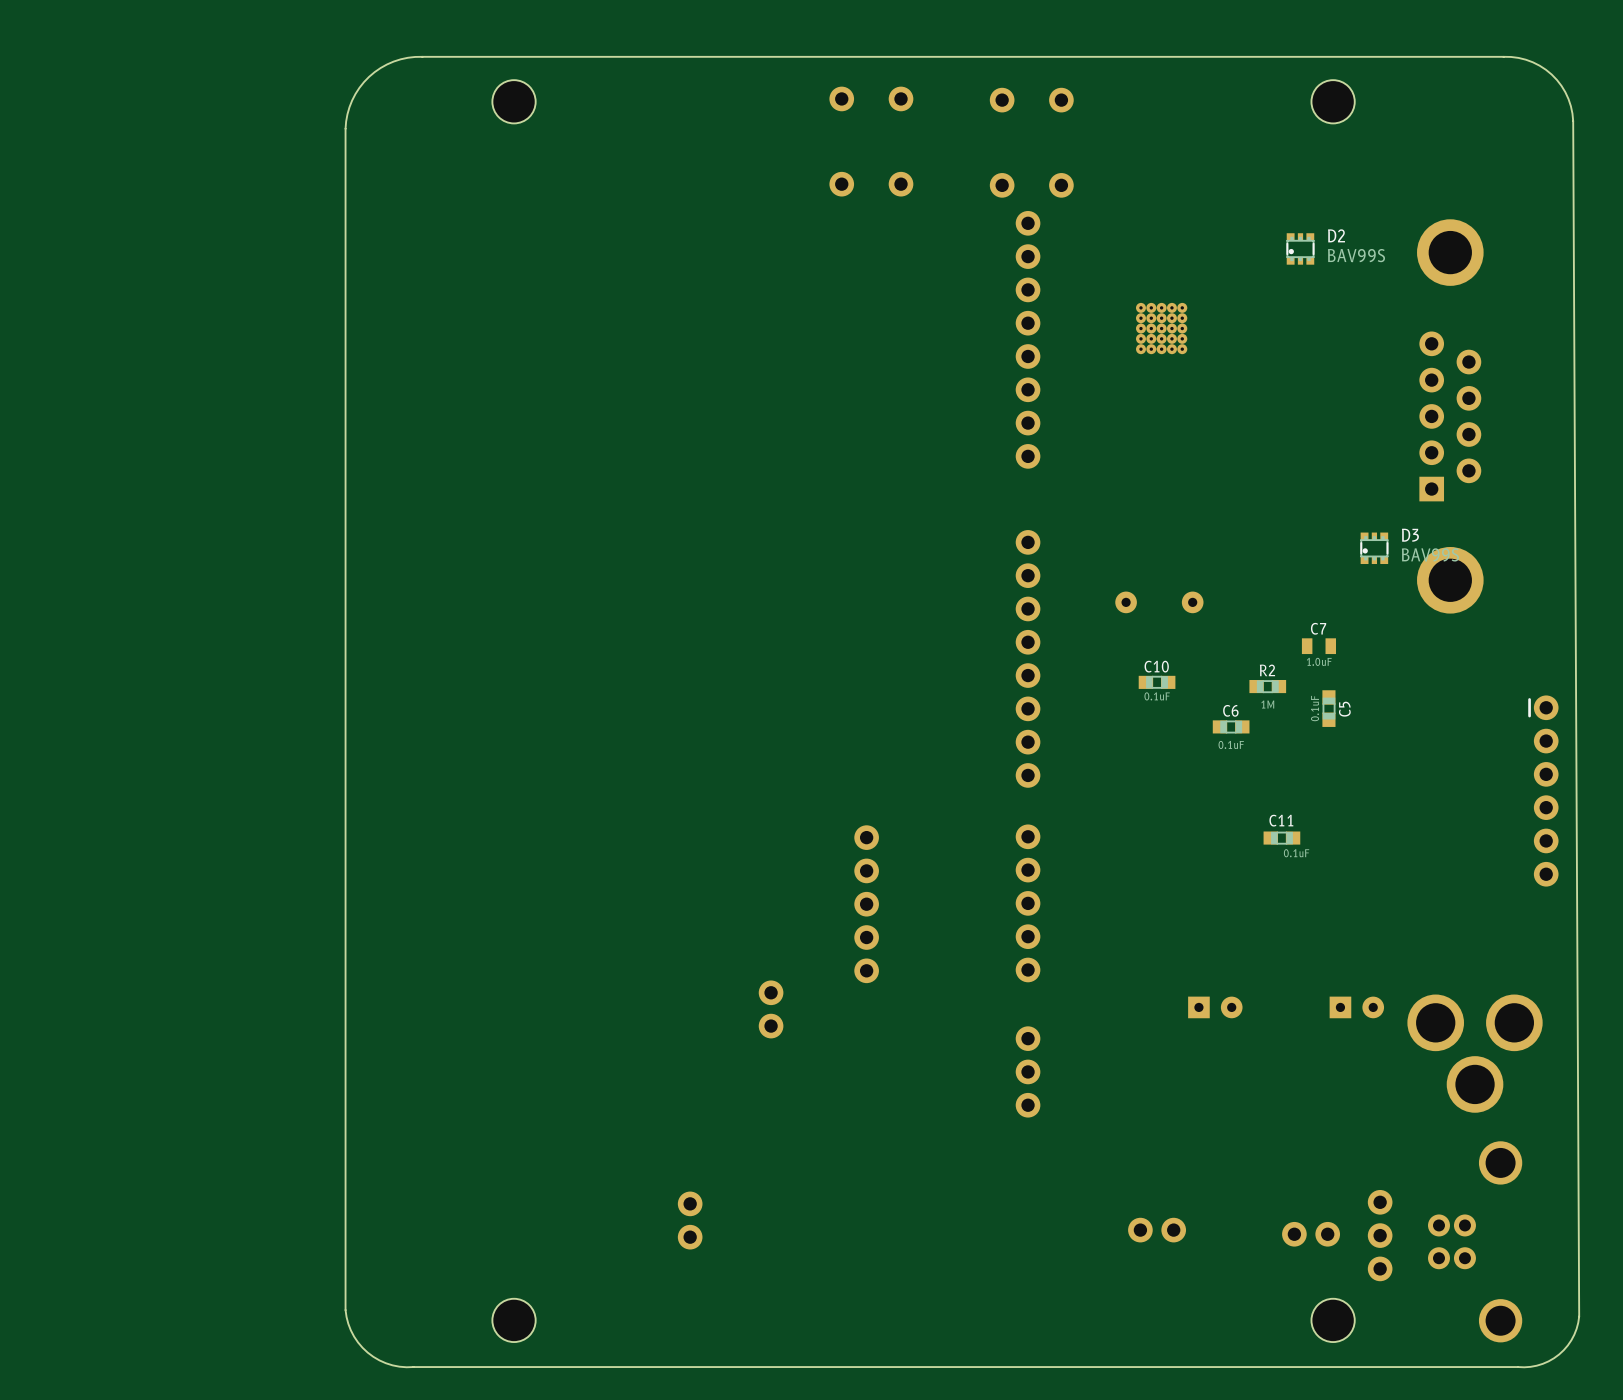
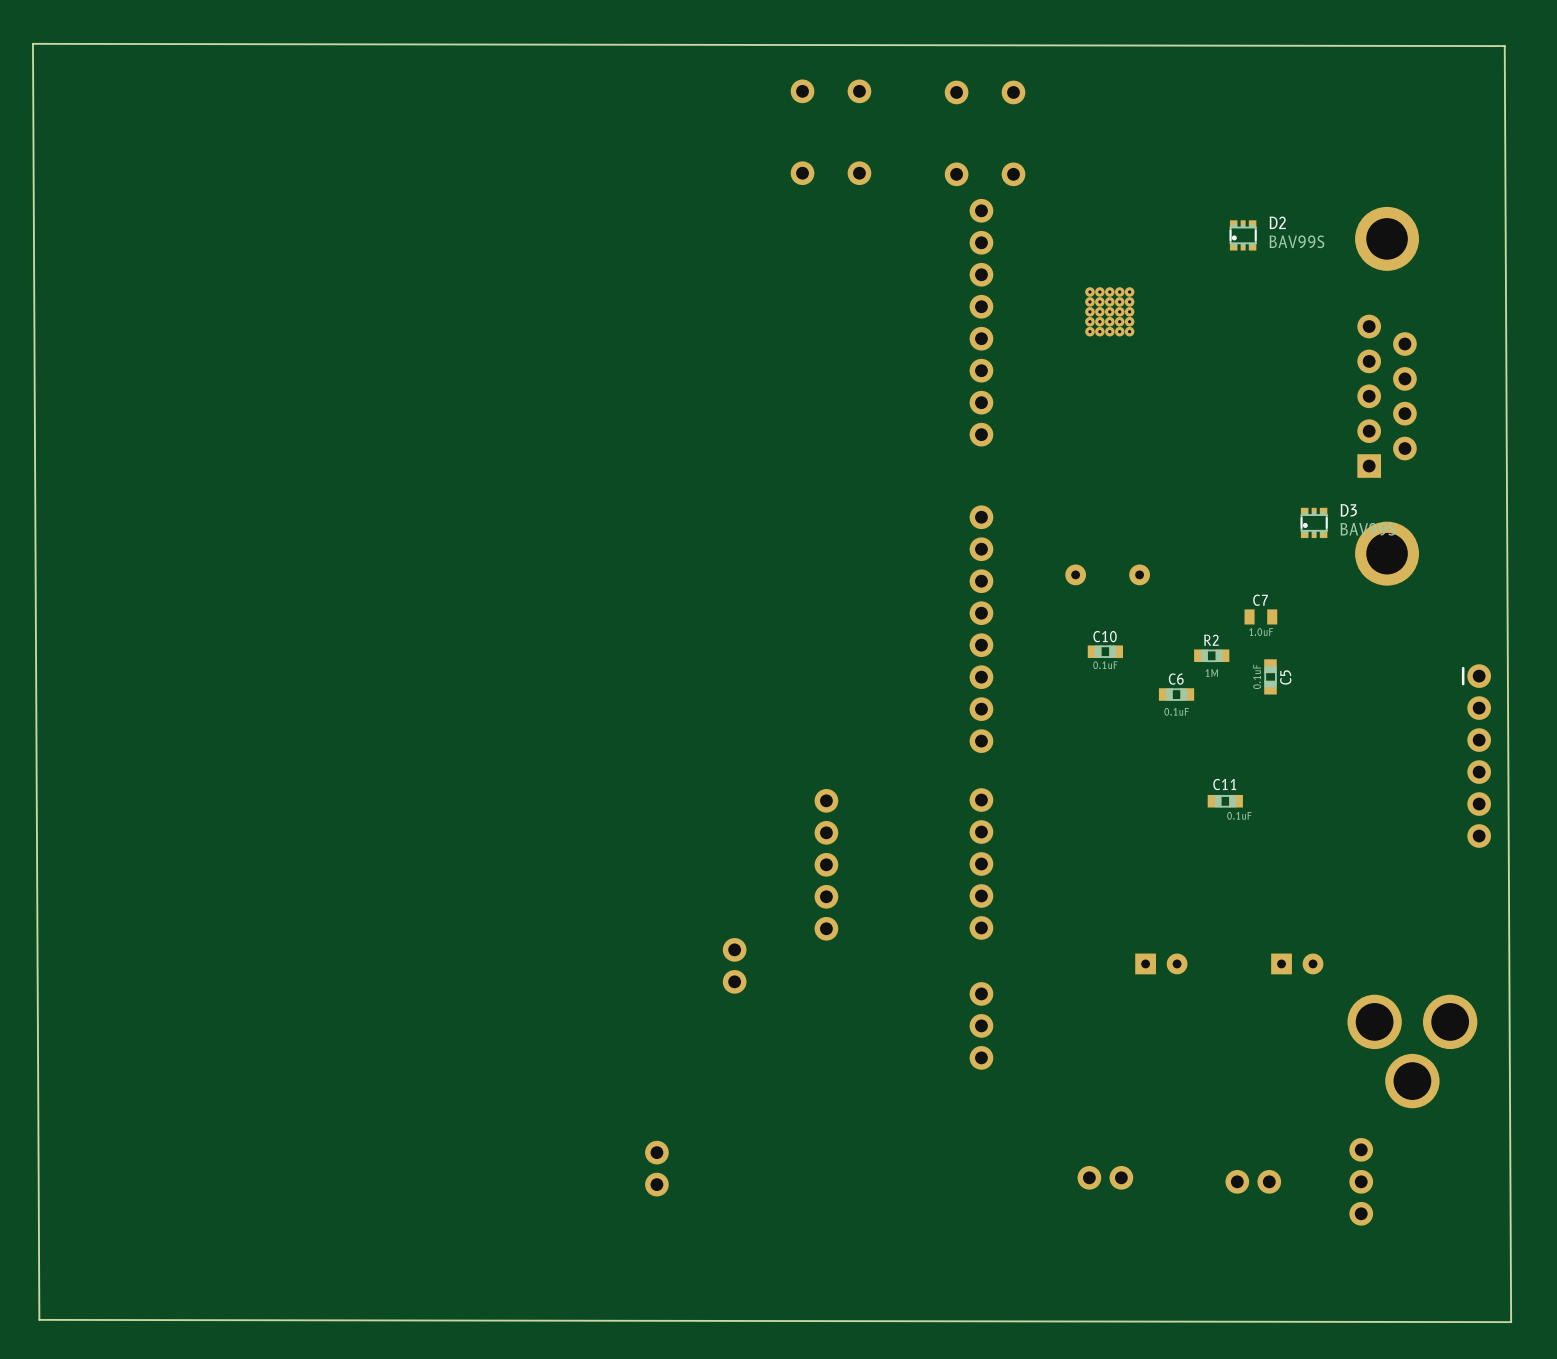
part: (514, 101) -> none
part: (1333, 101) -> none
board edge: (1573, 121) (1568, 99) (1556, 79) (1545, 69) (1532, 62) (1511, 56) (415, 56) (393, 61) (369, 76) (352, 100) (345, 128) (345, 1310) (350, 1330) (362, 1347) (373, 1356) (385, 1363) (406, 1367) (1524, 1367) (1542, 1363) (1559, 1354) (1571, 1340) (1579, 1316) -> (1505, 112) (1504, 46) (32, 43) (39, 1319) (1511, 1322) (1510, 1260)
part position: (1475, 1053) -> (1412, 1051)
part position: (1380, 1235) -> (1361, 1181)
part: (1475, 1241) -> none
part: (514, 1320) -> none
part: (1333, 1320) -> none

